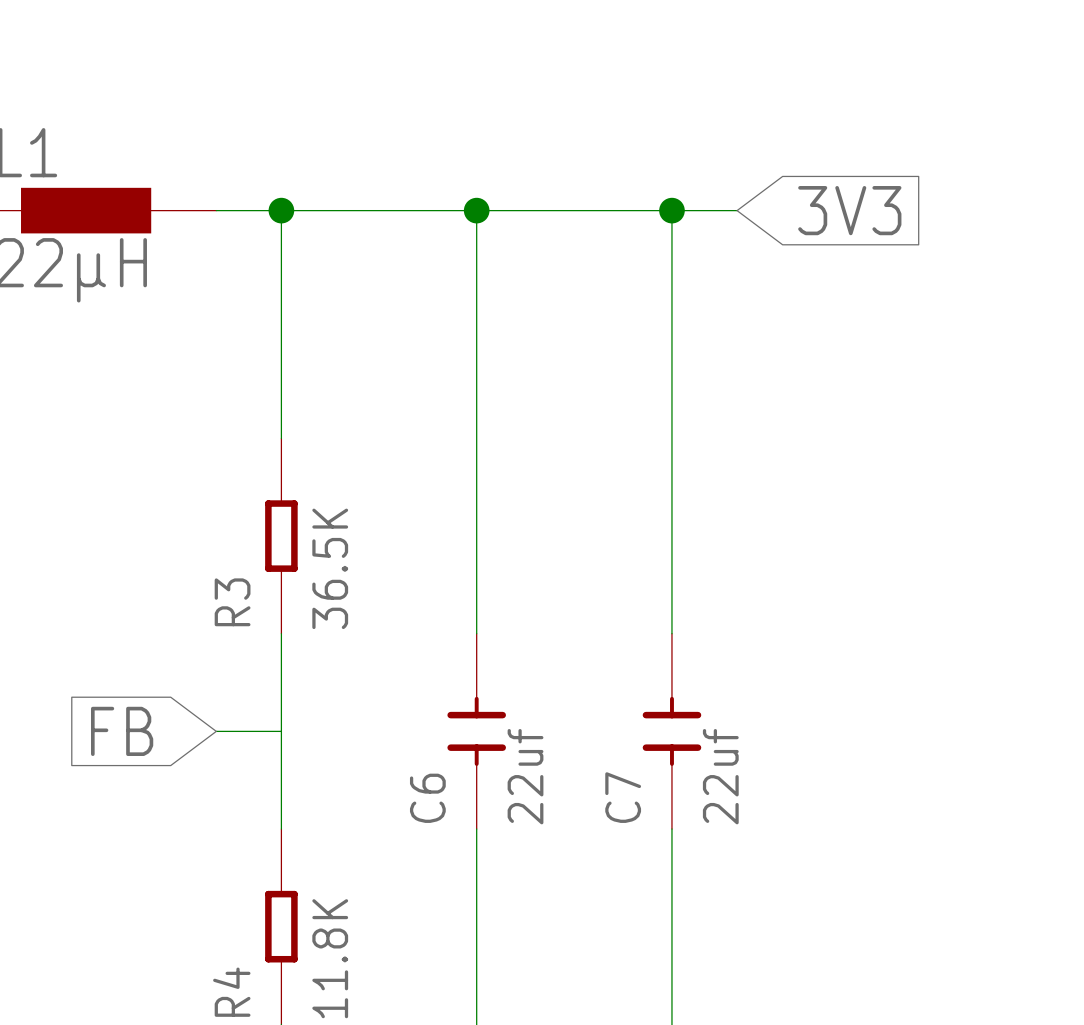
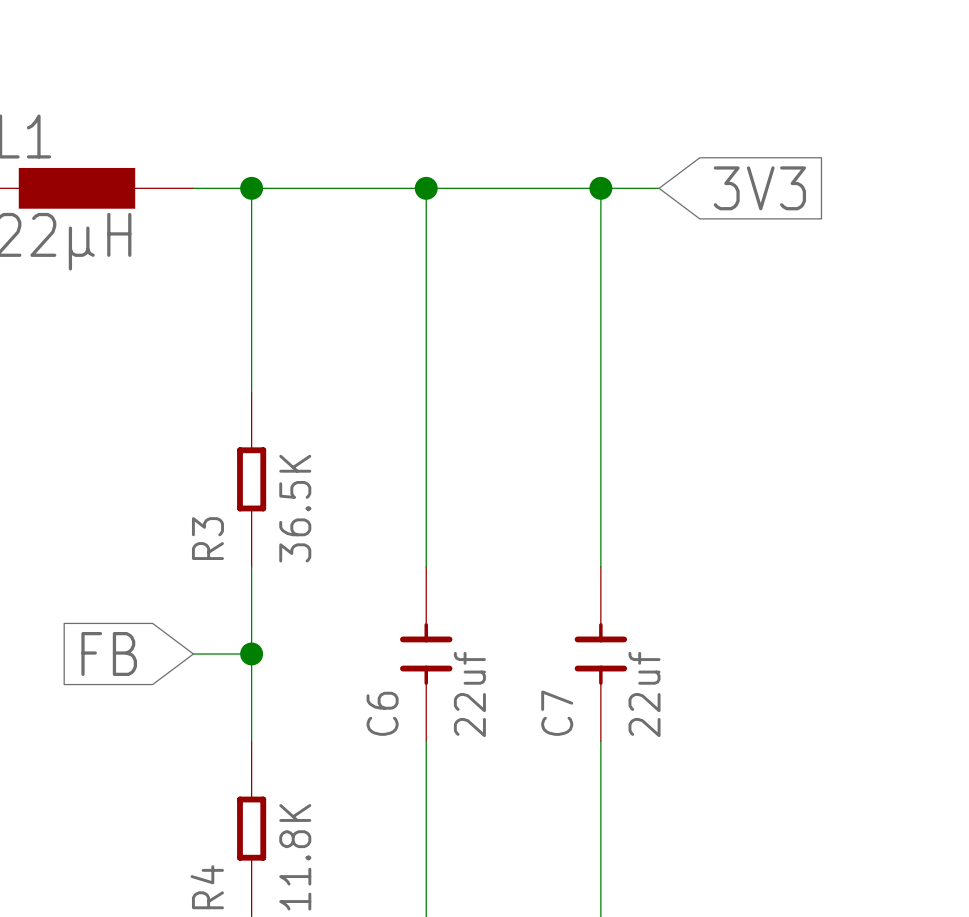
junction: none -> (251, 653)

